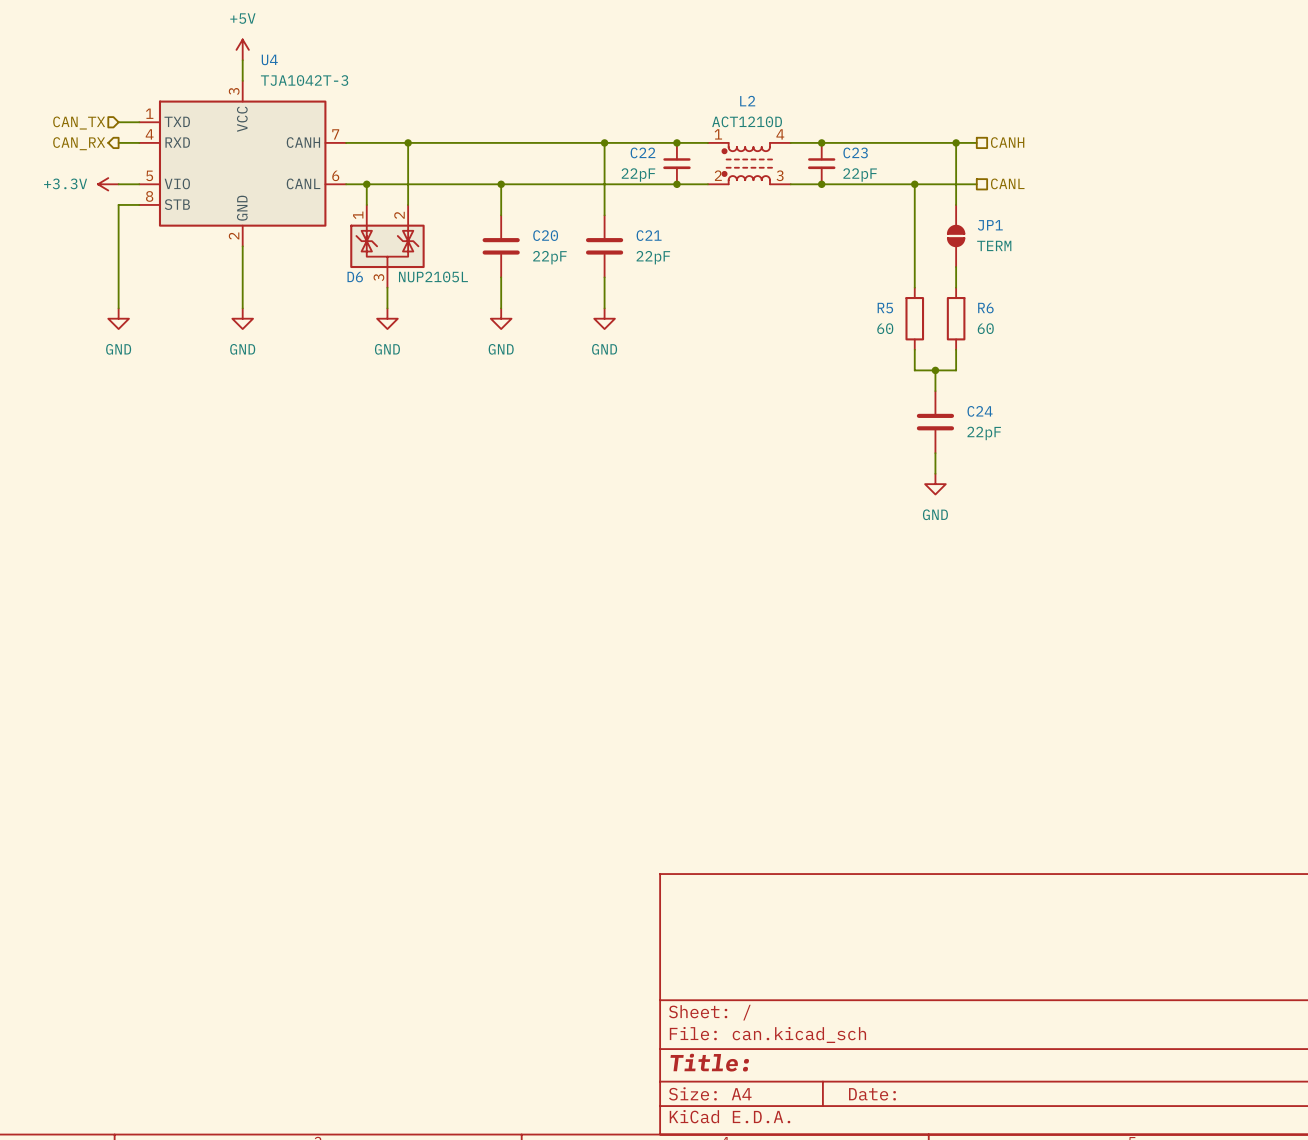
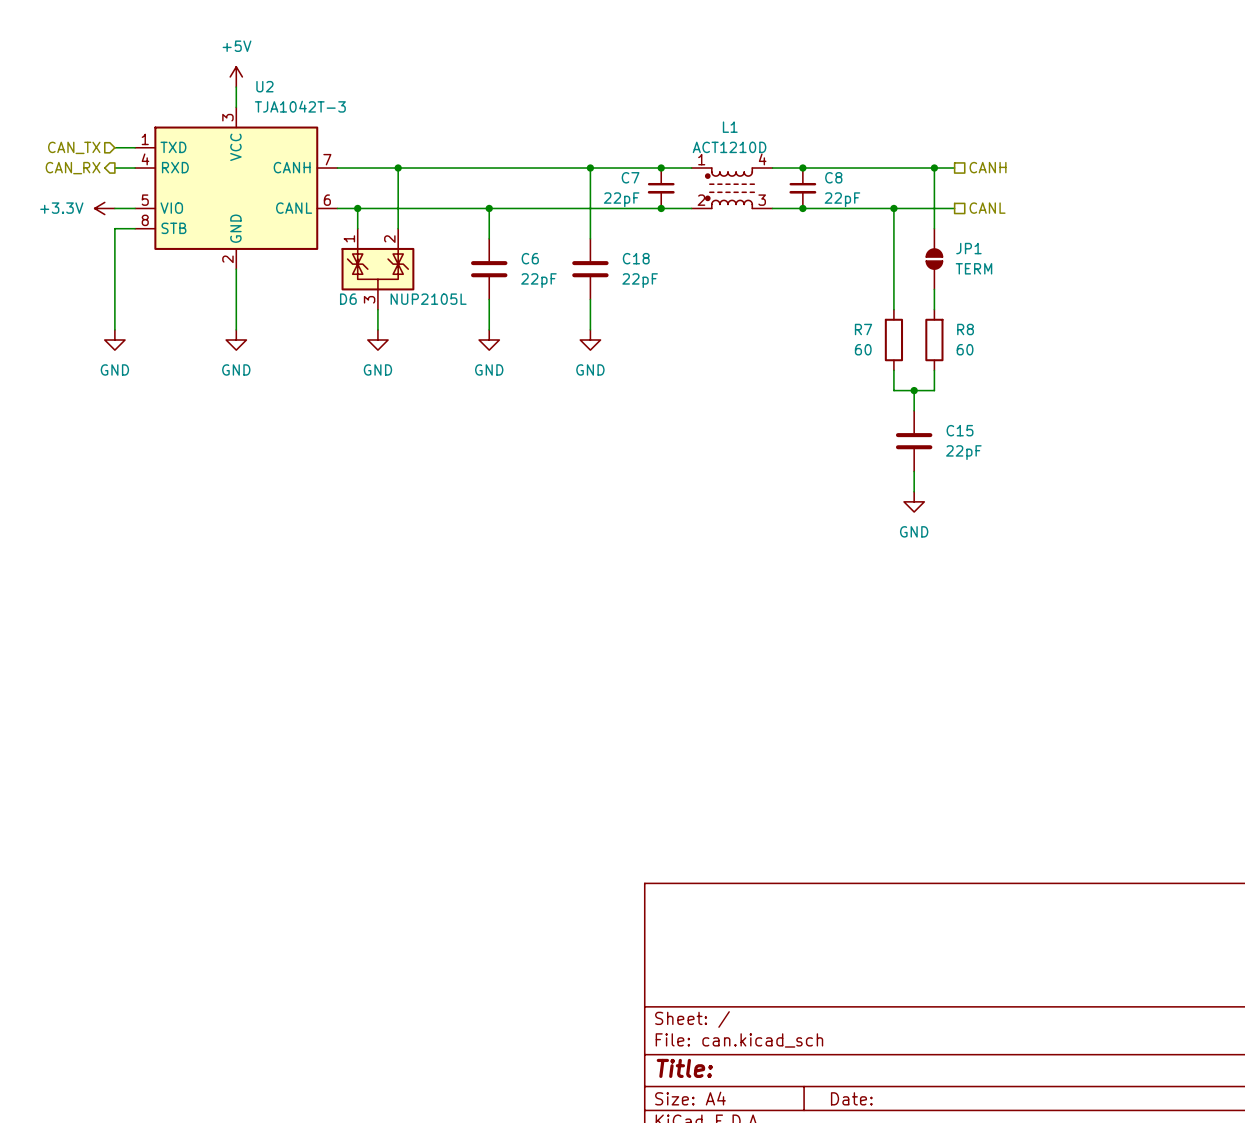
U4 name: U4 (269, 59) -> U2 (264, 86)
L2 name: L2 (747, 101) -> L1 (730, 127)
C22 name: C22 (642, 152) -> C7 (630, 177)
C23 name: C23 (855, 152) -> C8 (833, 177)
C20 name: C20 (545, 235) -> C6 (530, 258)
C21 name: C21 (649, 235) -> C18 (636, 258)
R5 name: R5 (885, 308) -> R7 (863, 329)
R6 name: R6 (985, 308) -> R8 (965, 329)
C24 name: C24 (980, 411) -> C15 (960, 430)

